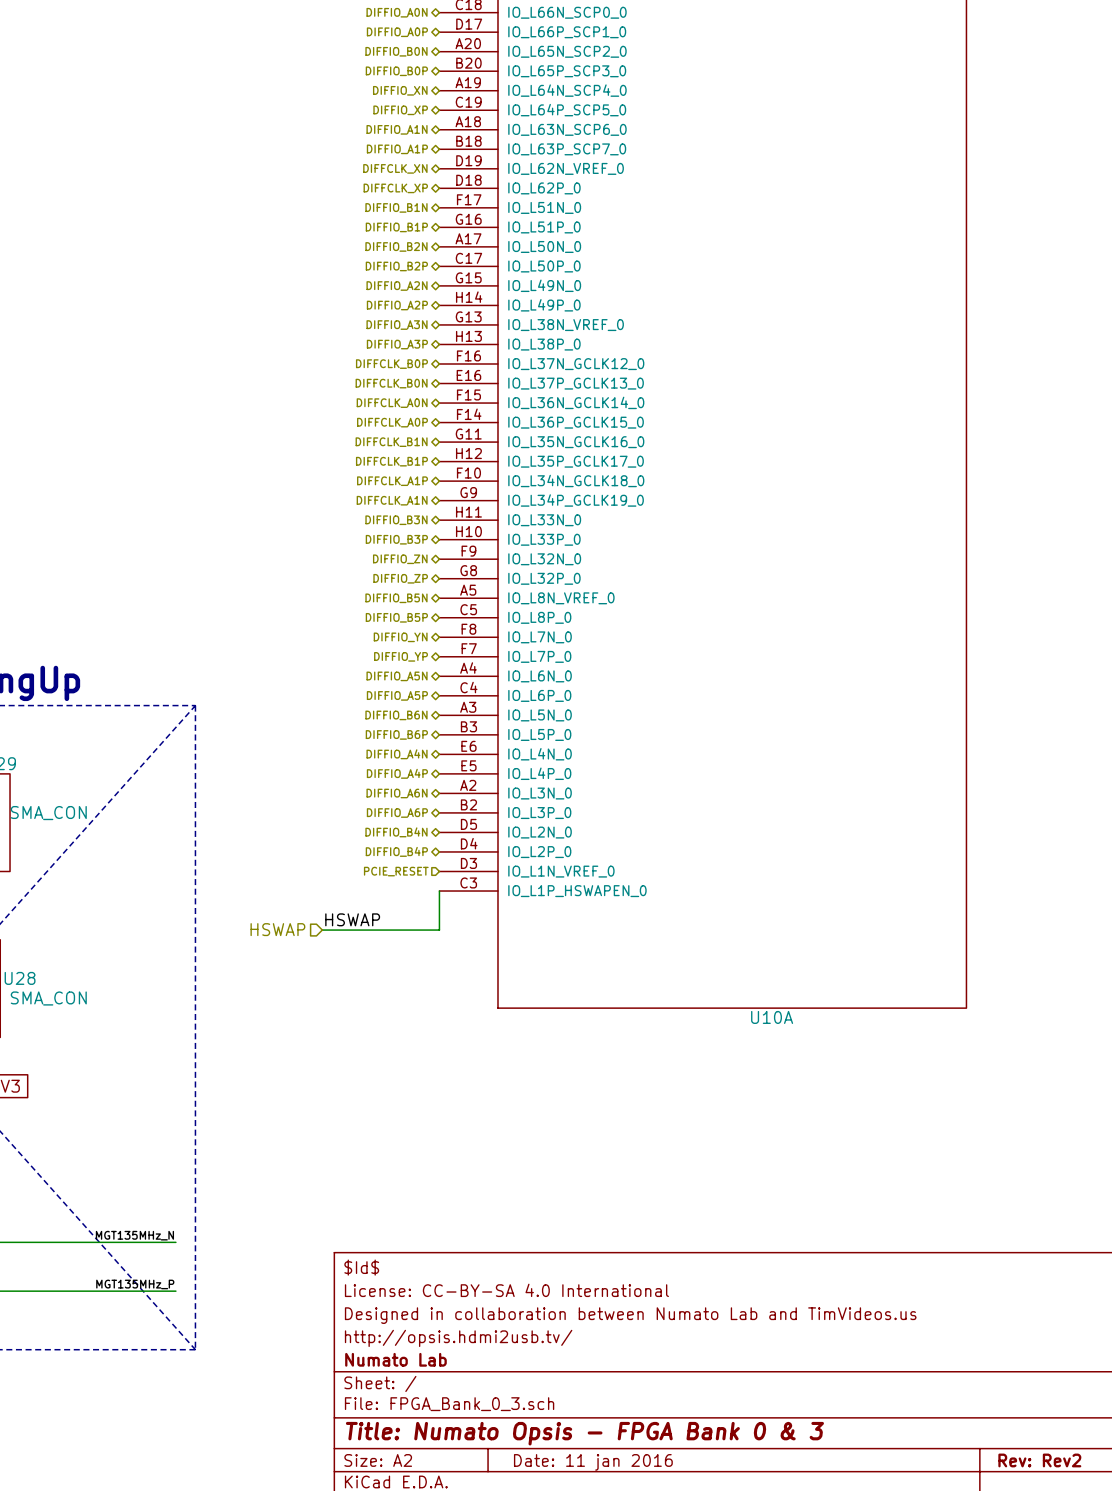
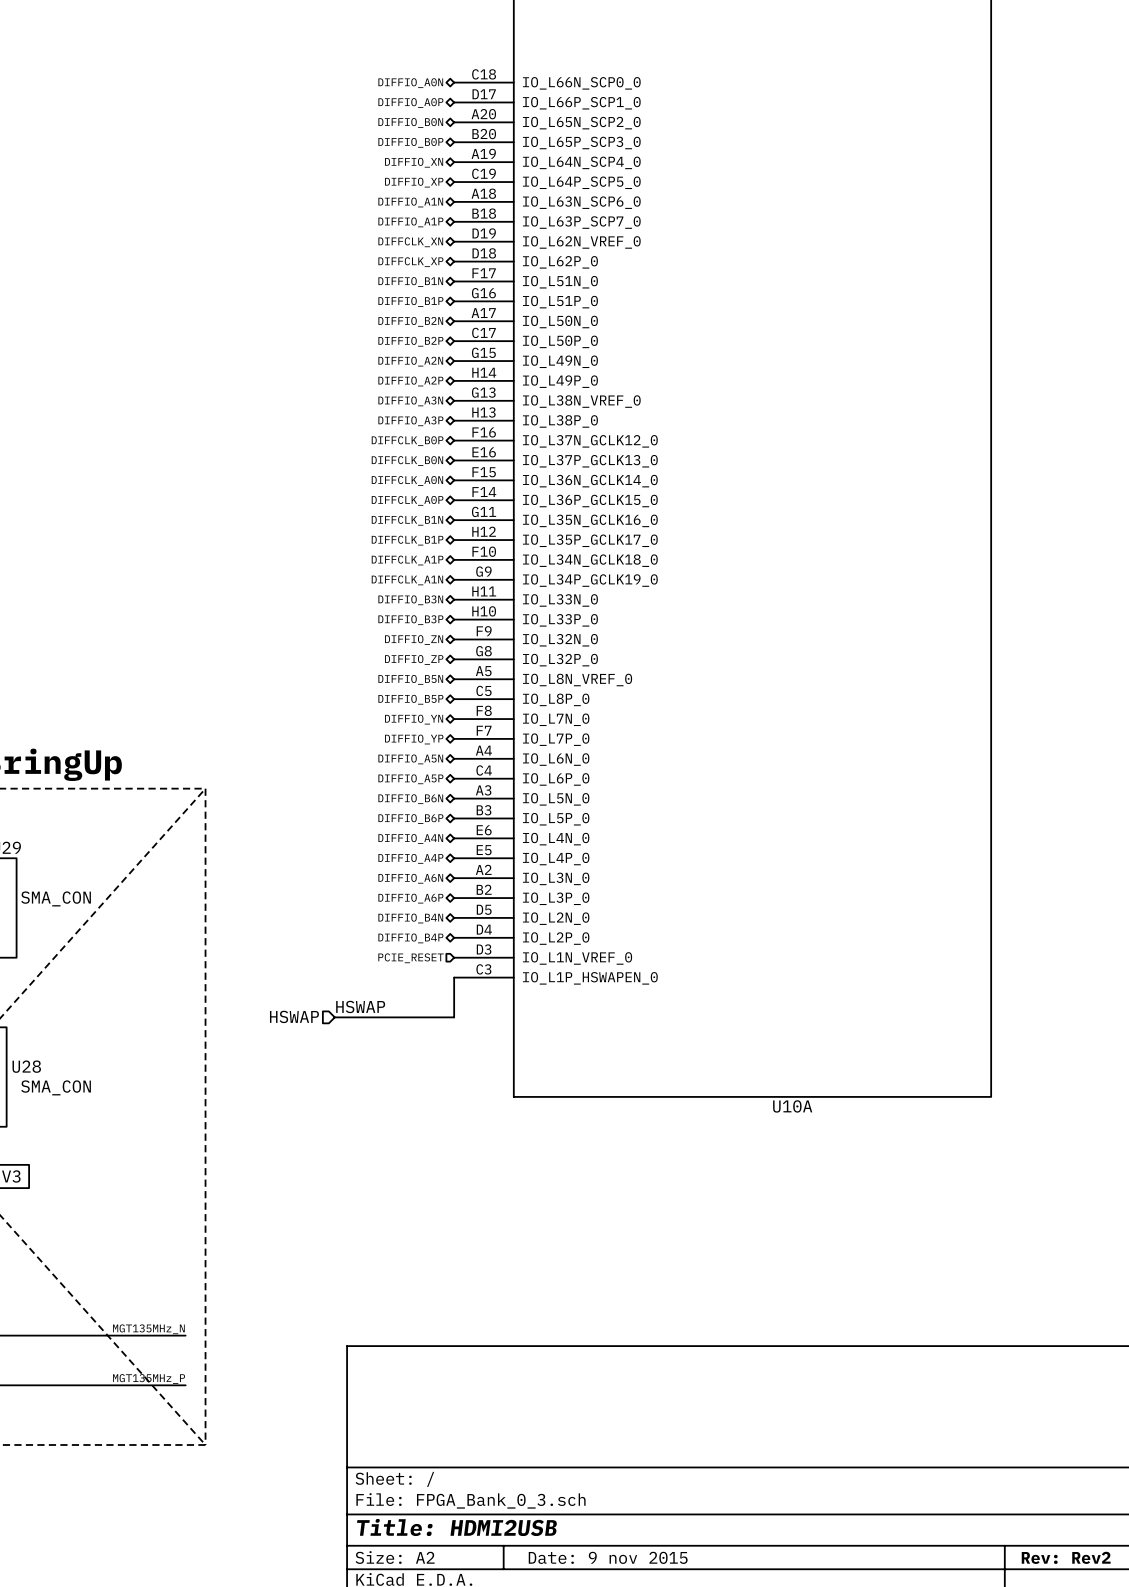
title block: $Id$ (361, 1267) -> none
title block: License: CC-BY-SA 4.0 International (506, 1290) -> none
title block: Designed in collaboration between Numato Lab and TimVideos.us (630, 1315) -> none
title block: http://opsis.hdmi2usb.tv/ (458, 1338) -> none
title block: Numato Lab (395, 1359) -> none
title block: Title: Numato Opsis - FPGA Bank 0 & 3 (584, 1433) -> Title: HDMI2USB (457, 1527)
title block: Date: 11 jan 2016 (593, 1462) -> Date: 9 nov 2015 (608, 1557)

